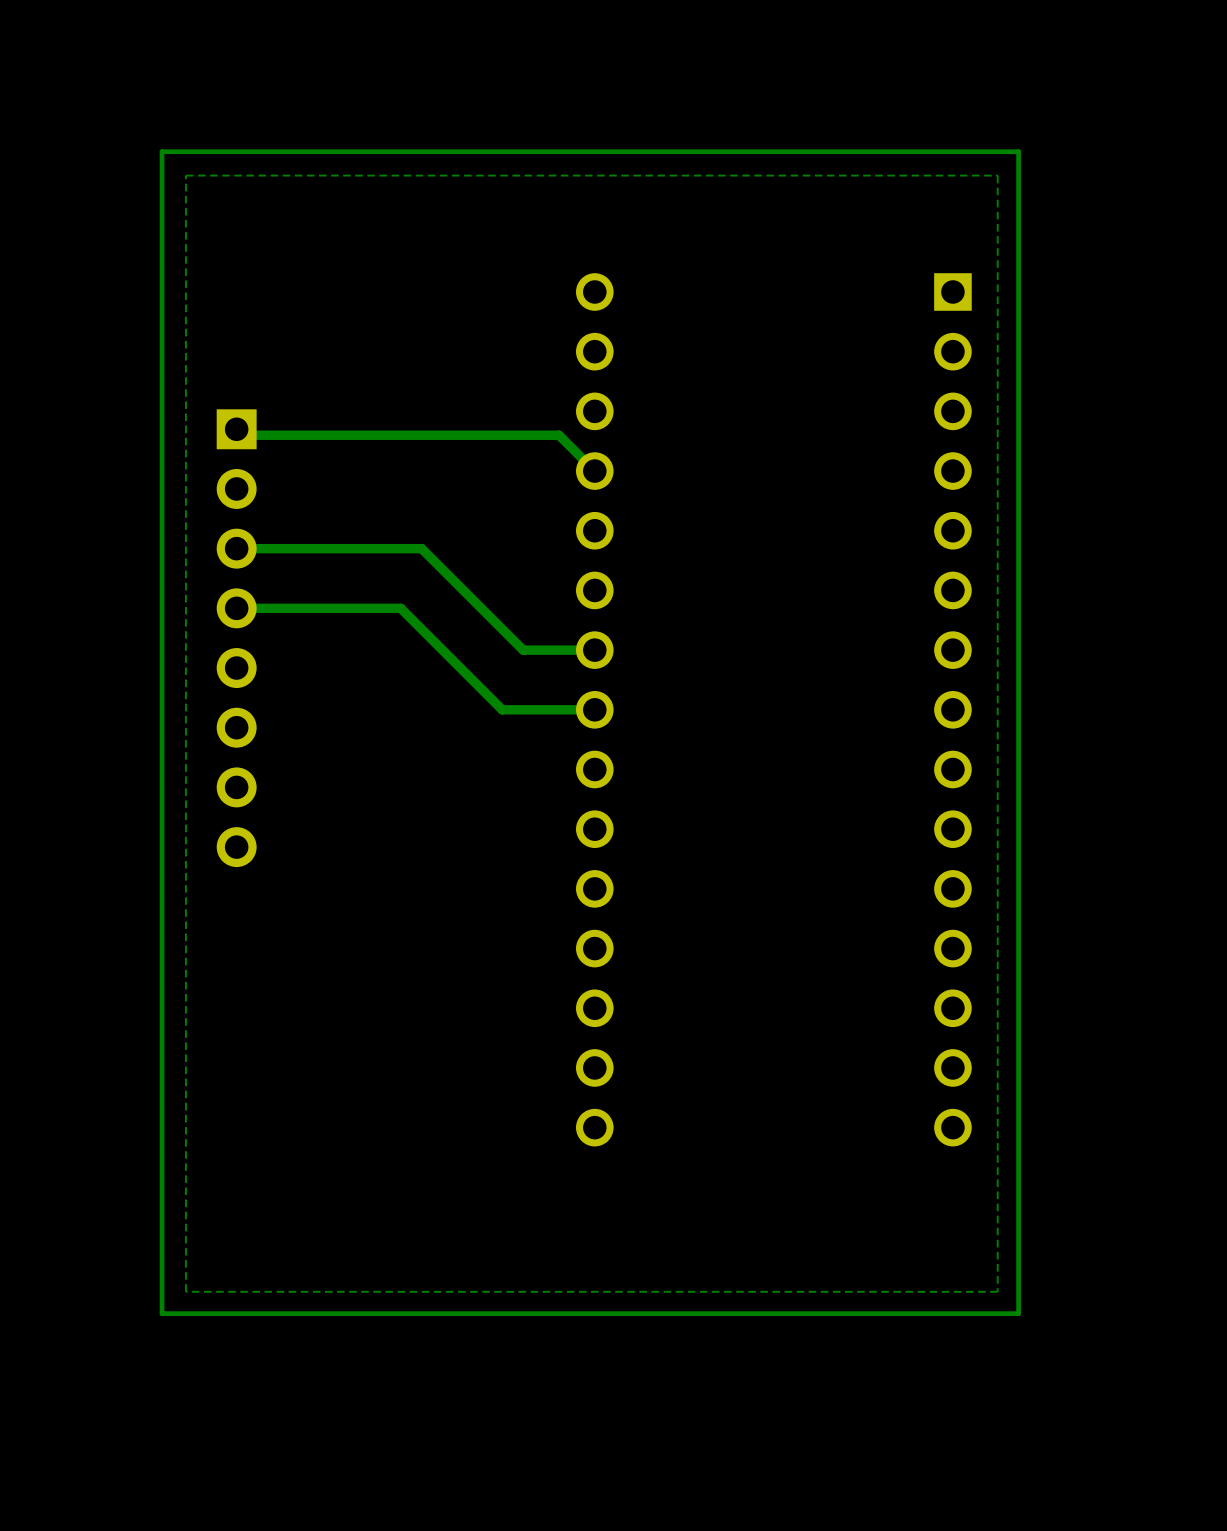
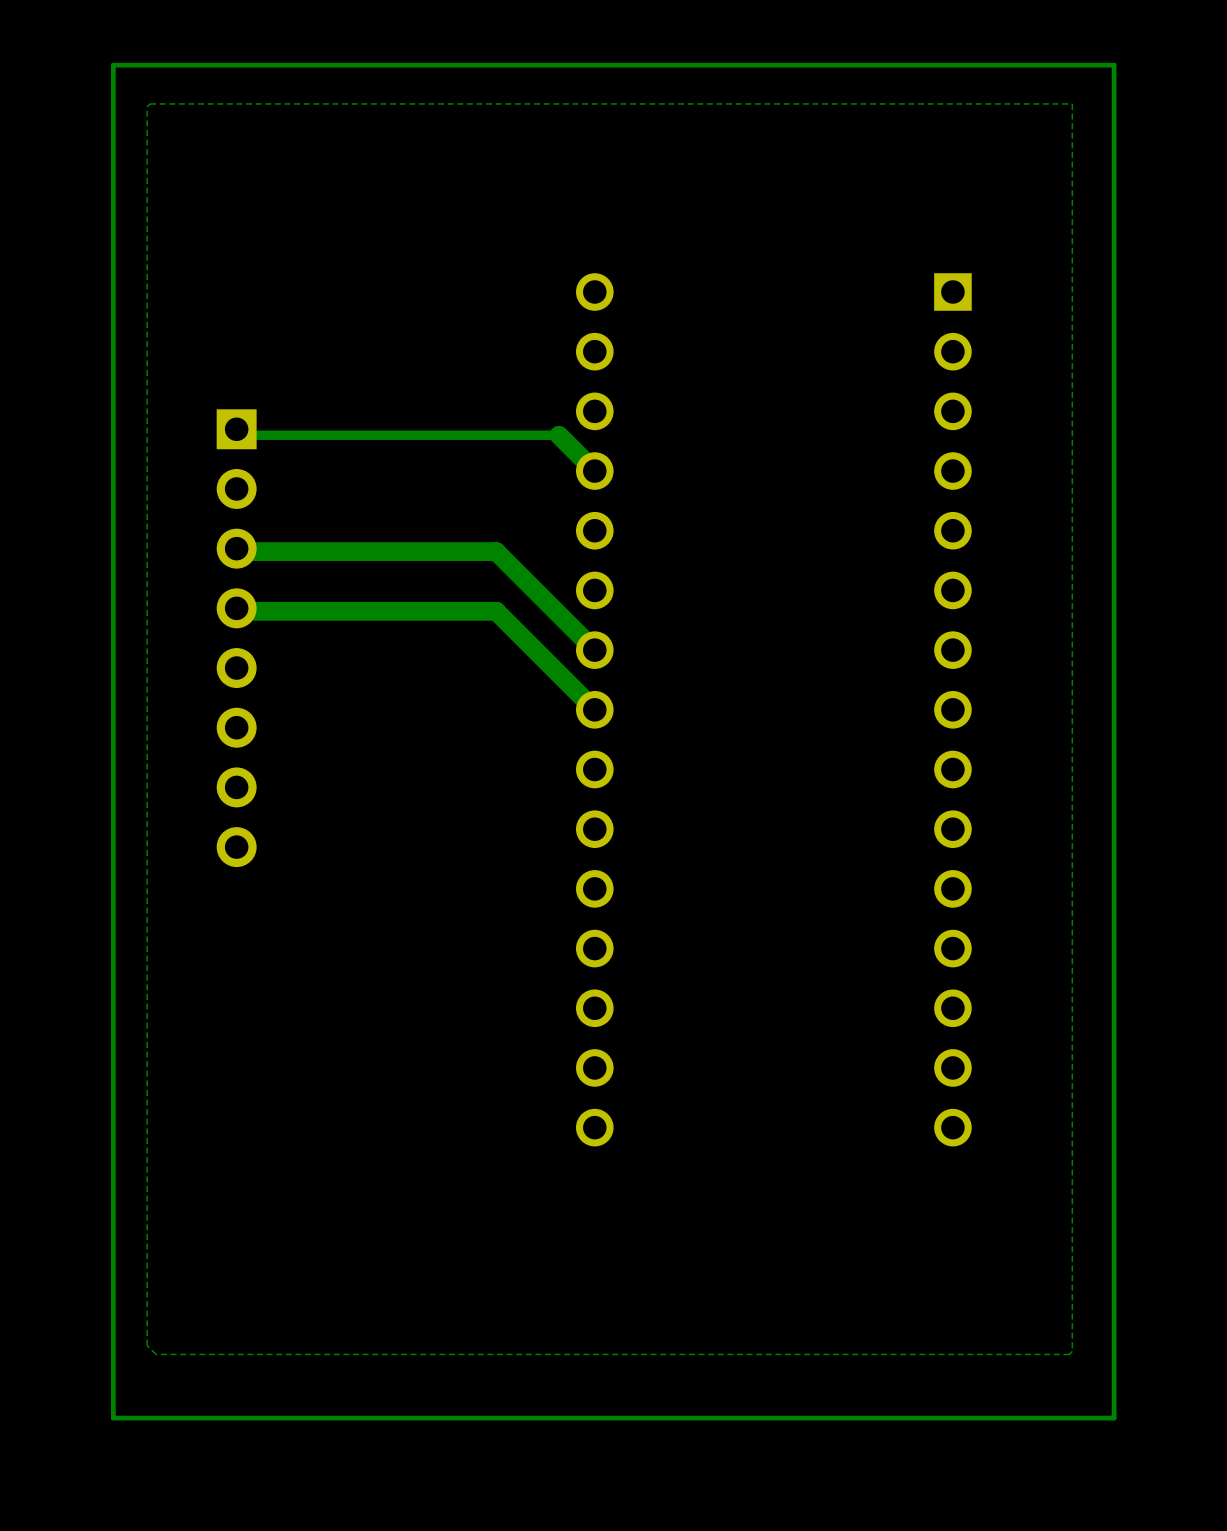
bottom track: (1018, 151) (162, 151) (162, 1313) (1018, 1313) (1018, 151) -> (1114, 65) (1114, 1418) (113, 1418) (113, 65) (1114, 65)
bottom zone outline: (997, 175) (997, 1291) (185, 1291) (185, 175) (997, 175) -> (1072, 103) (1072, 1351) (1069, 1354) (156, 1354) (147, 1345) (147, 106) (150, 103) (1072, 103)
bottom track width: thin (558, 435) (594, 471) -> thick (558, 435) (594, 471)
bottom track: (236, 548) (421, 548) (523, 650) (594, 650) -> (233, 551) (496, 551) (594, 650)
bottom track: (236, 608) (400, 608) (502, 709) (594, 709) -> (233, 611) (496, 611) (594, 709)

